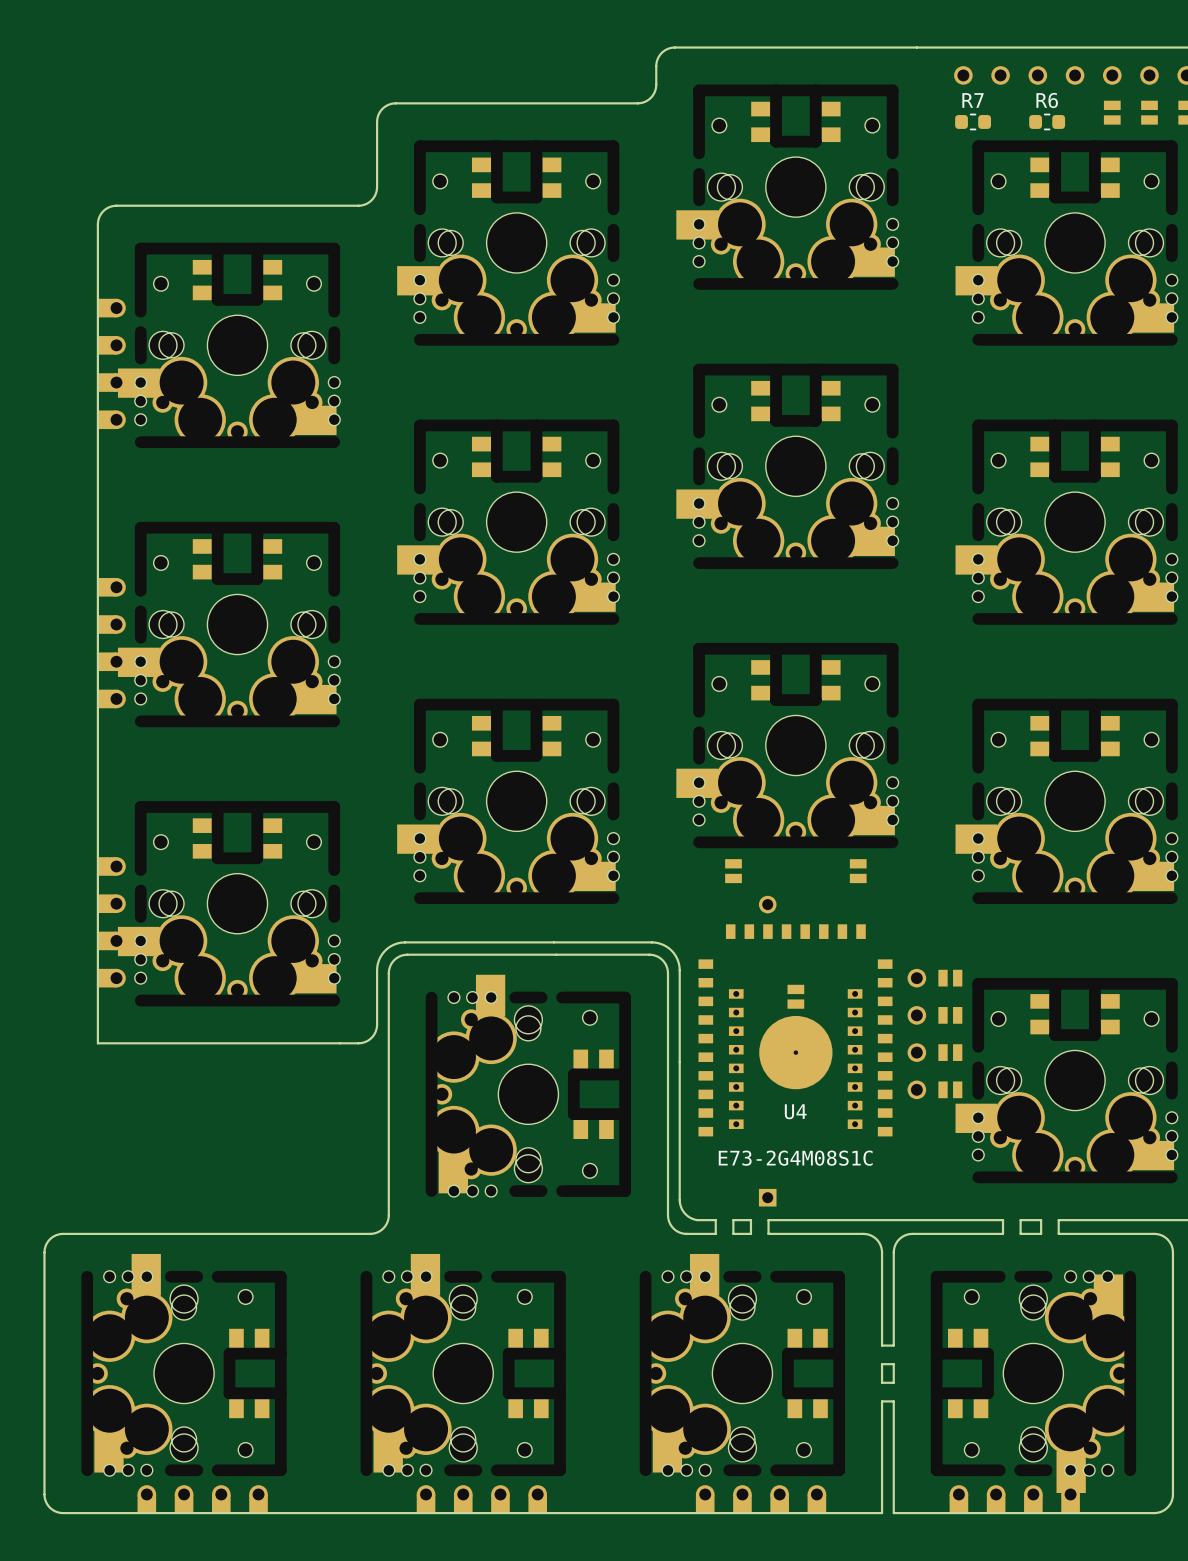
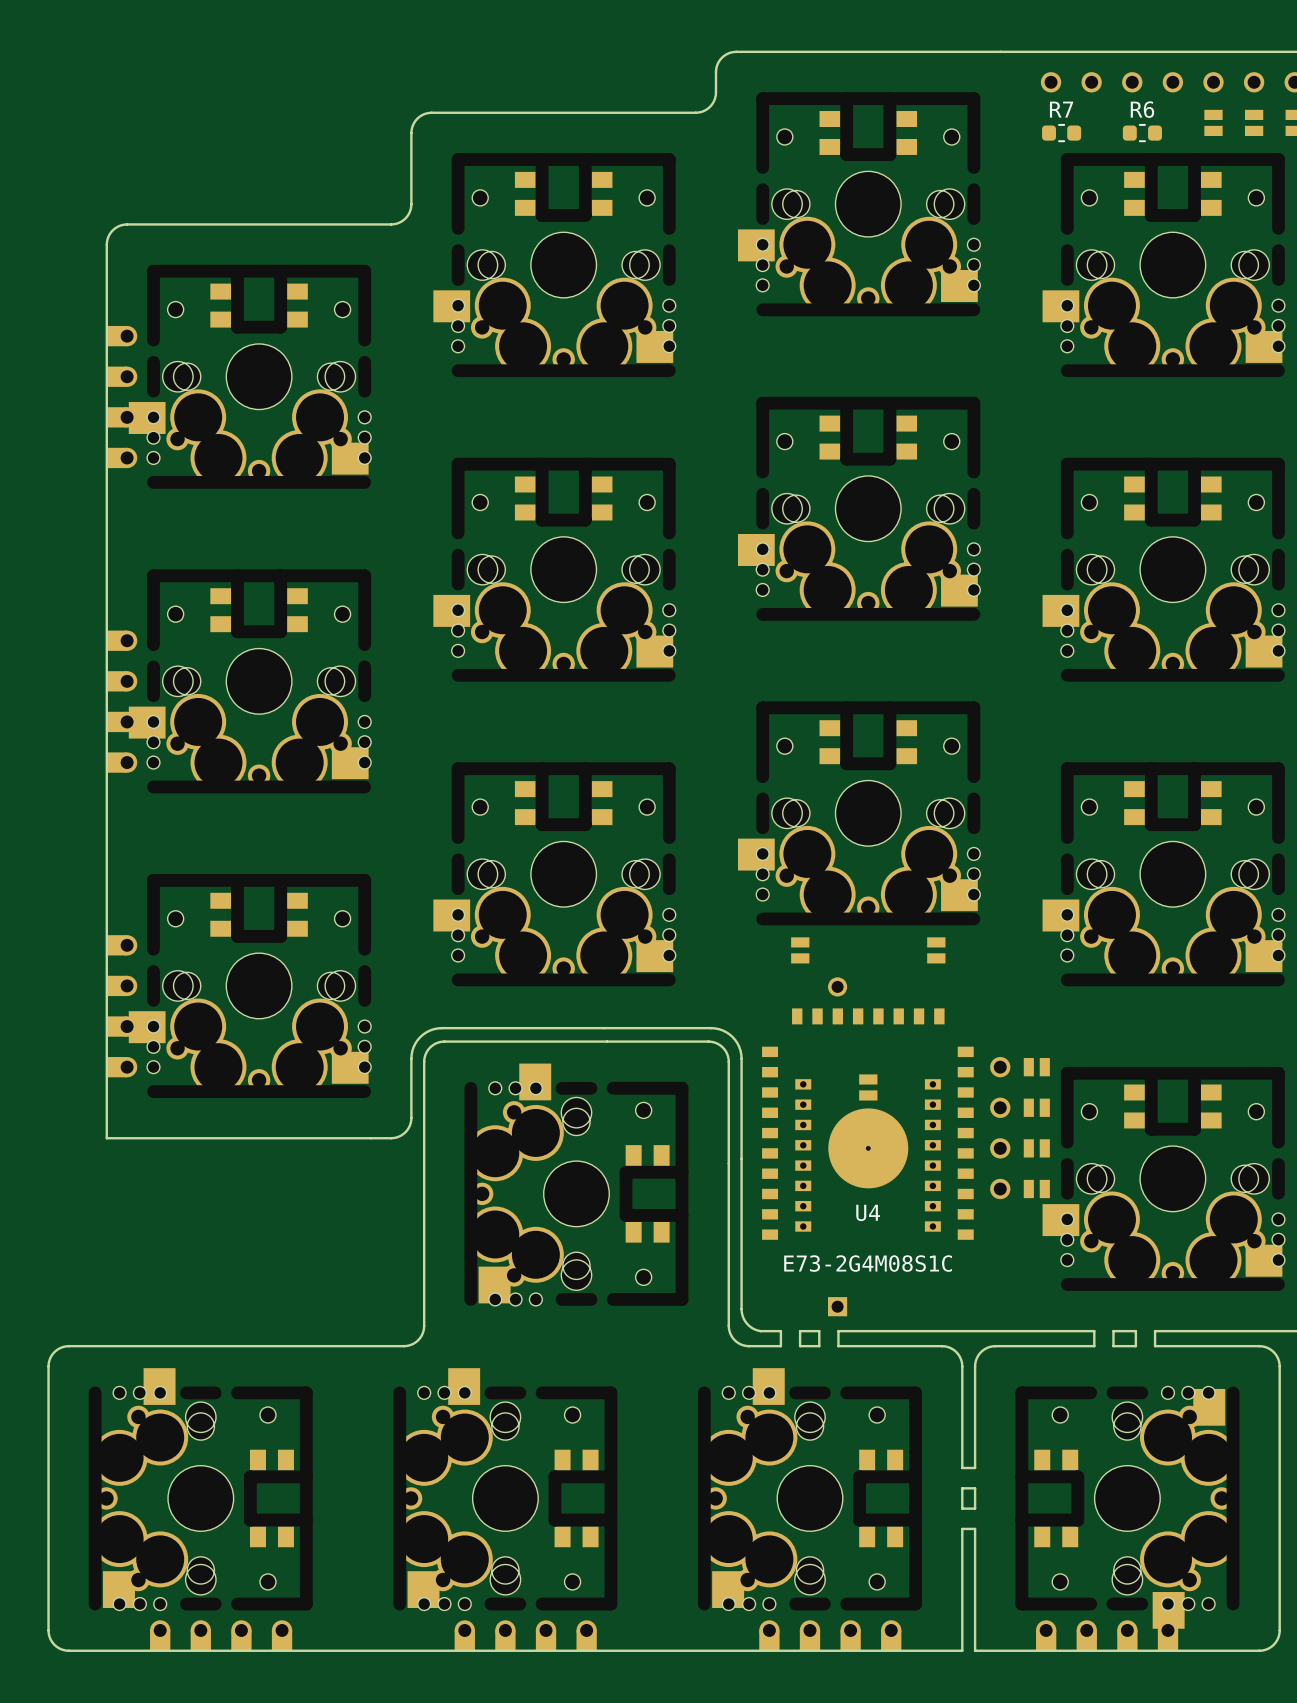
part footprint: [676, 84, 899, 290] -> [737, 92, 981, 317]
part footprint: [397, 140, 620, 346] -> [433, 153, 676, 378]
part footprint: [955, 140, 1178, 346] -> [1042, 153, 1285, 378]
part footprint: [117, 242, 341, 449] -> [128, 264, 372, 489]
part footprint: [676, 363, 899, 570] -> [737, 396, 981, 621]
part footprint: [397, 419, 620, 625] -> [433, 457, 676, 682]
part footprint: [955, 419, 1178, 625] -> [1042, 457, 1285, 682]
part footprint: [117, 521, 341, 728] -> [128, 569, 372, 794]
part footprint: [676, 642, 899, 849] -> [737, 701, 981, 926]
part footprint: [397, 698, 620, 905] -> [433, 762, 676, 987]
part footprint: [955, 698, 1178, 905] -> [1042, 762, 1285, 987]
part footprint: [117, 801, 341, 1007] -> [128, 874, 372, 1098]
part footprint: [425, 974, 631, 1197] -> [464, 1063, 689, 1306]
part footprint: [955, 977, 1178, 1184] -> [1042, 1066, 1285, 1291]
part footprint: [81, 1253, 287, 1477] -> [88, 1368, 313, 1611]
part footprint: [360, 1253, 566, 1477] -> [393, 1368, 618, 1611]
part footprint: [639, 1253, 846, 1477] -> [697, 1368, 922, 1611]
part footprint: [930, 1270, 1137, 1494] -> [1015, 1386, 1240, 1629]

